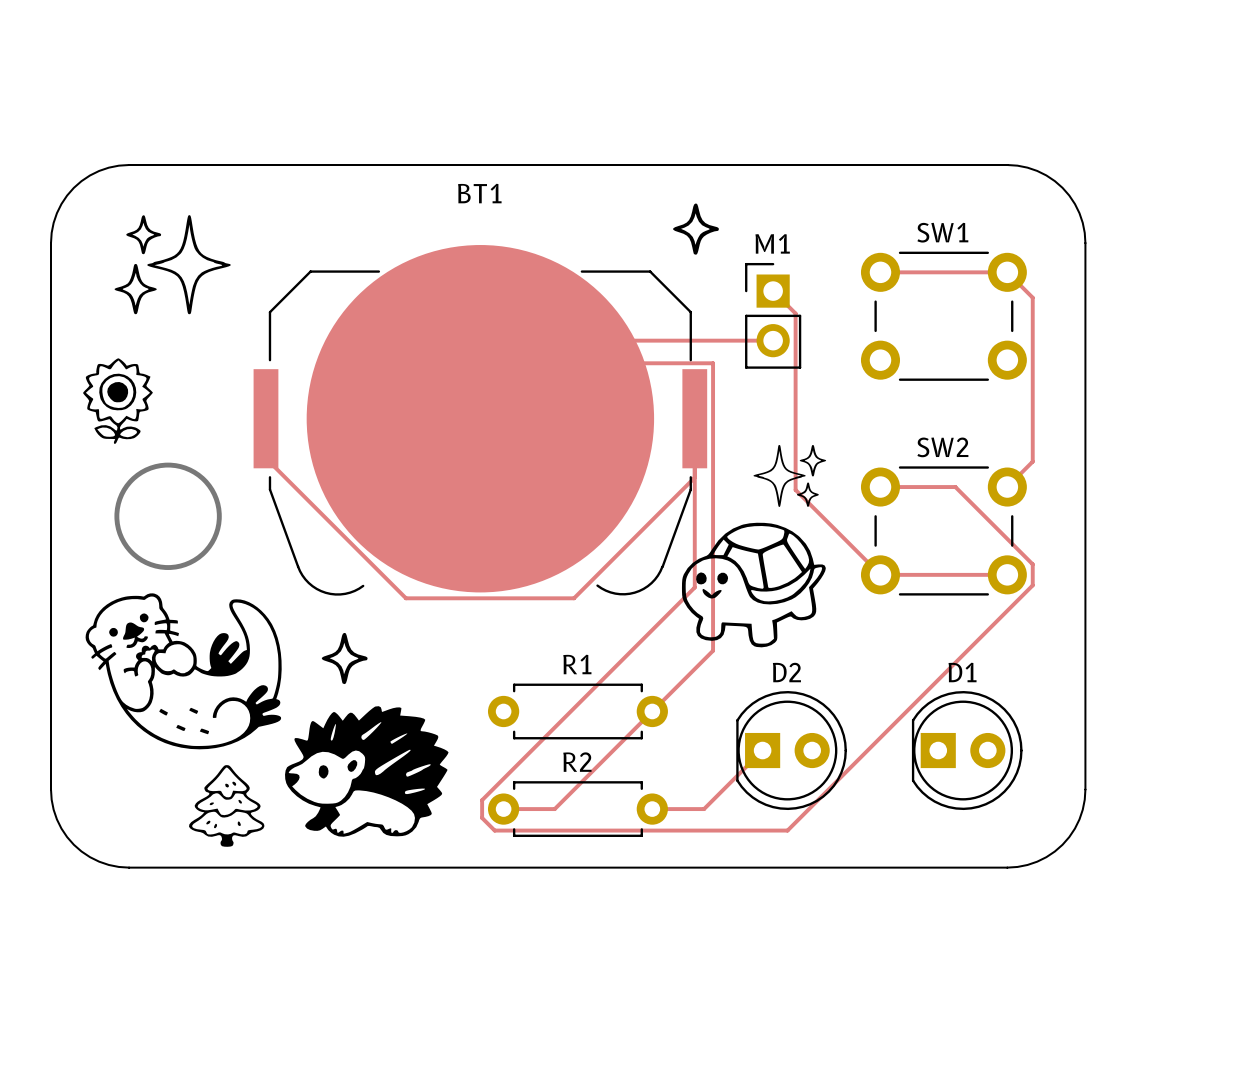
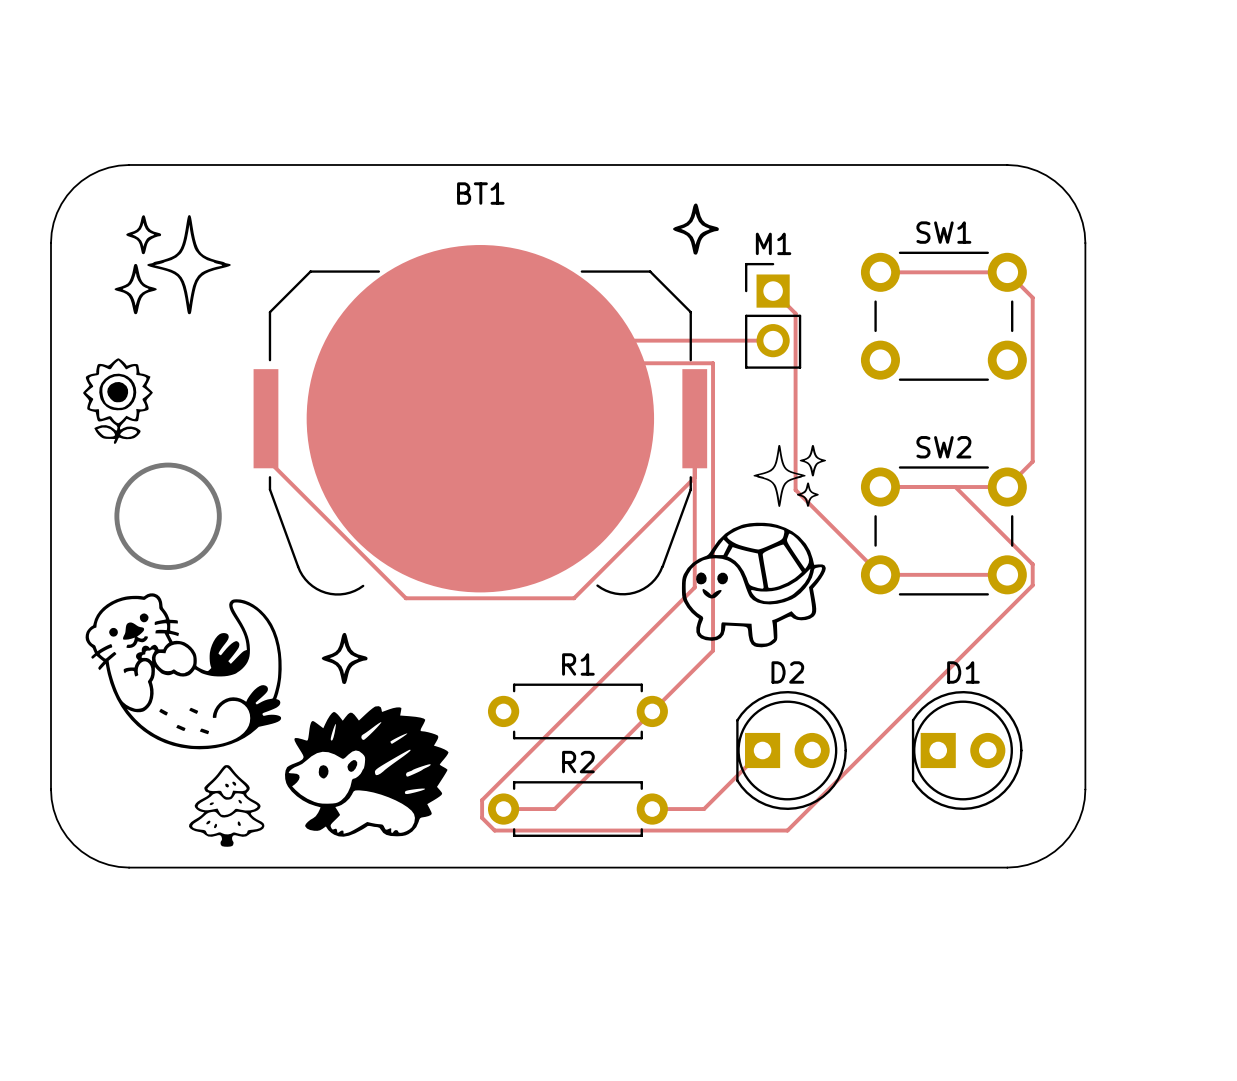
track: none -> (955, 487) (1007, 487)

